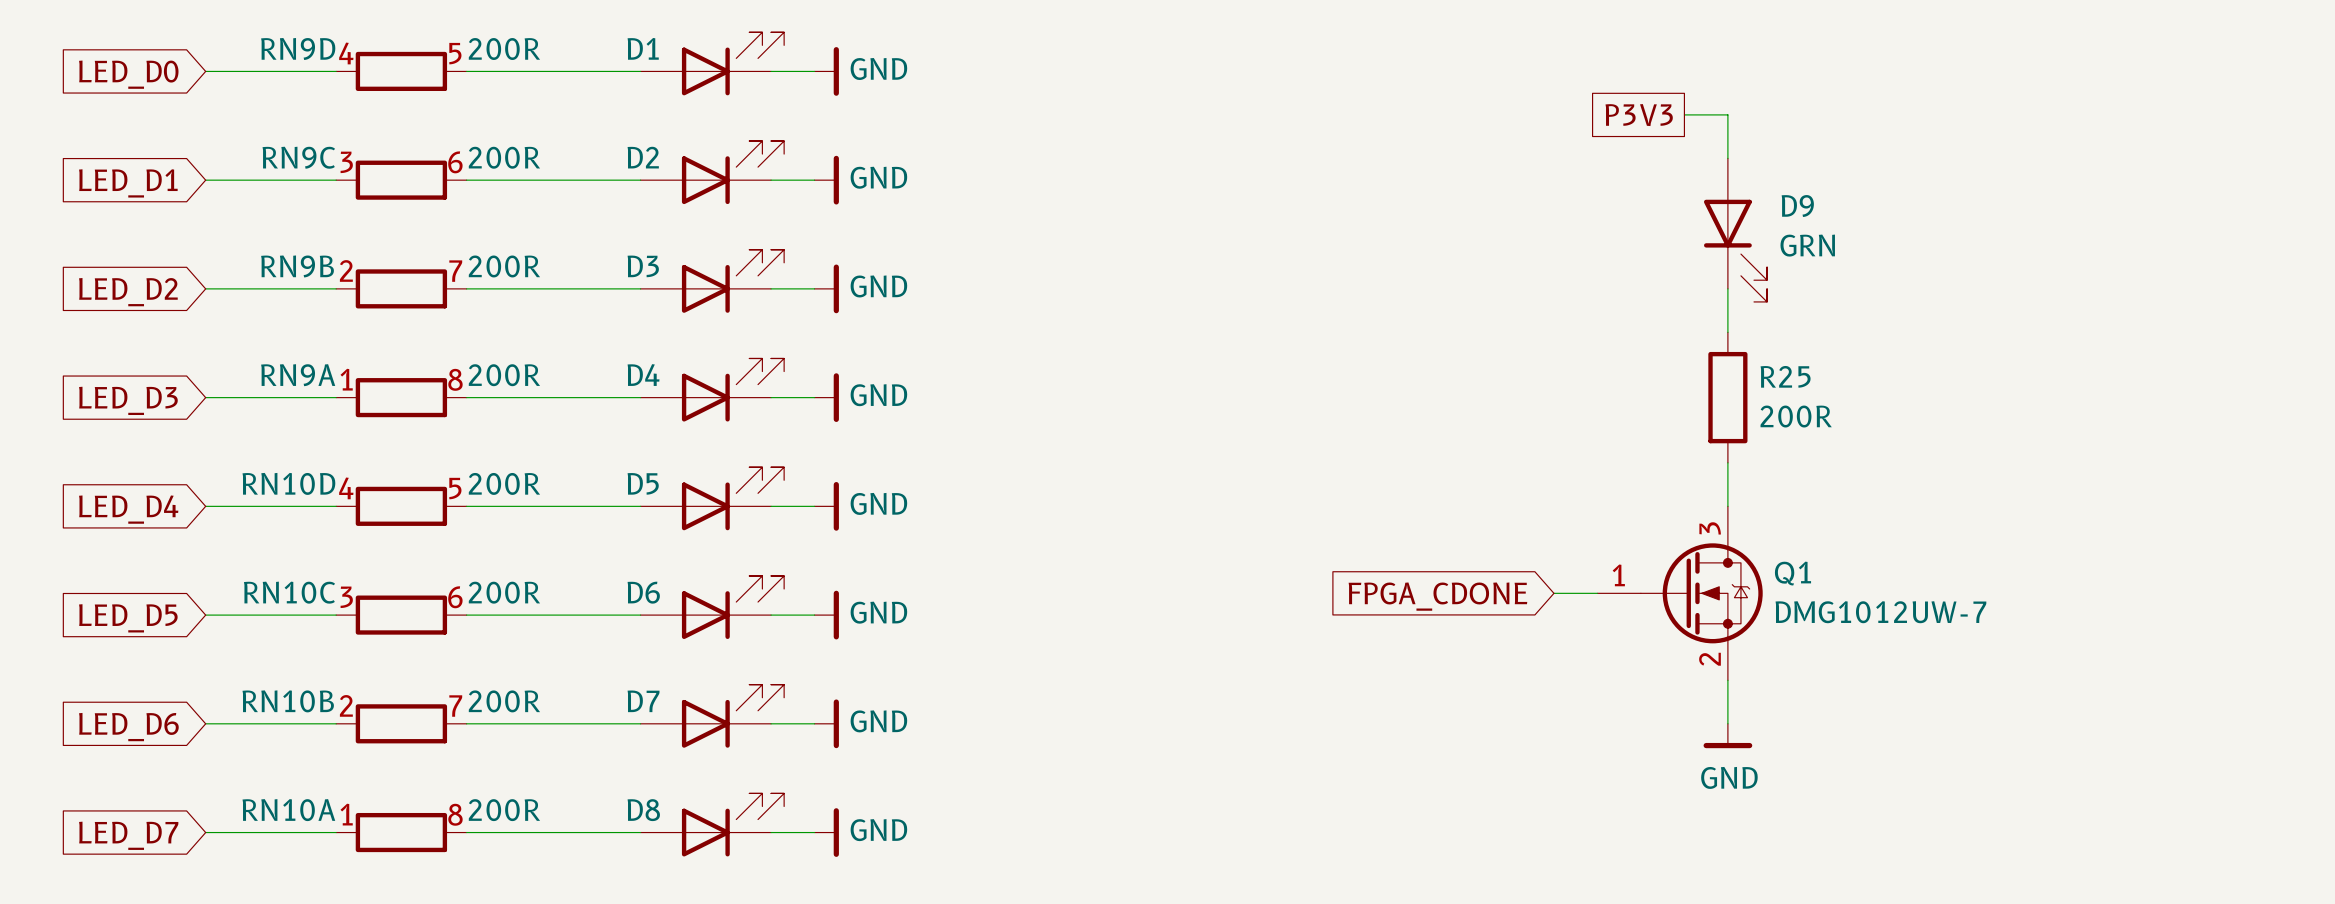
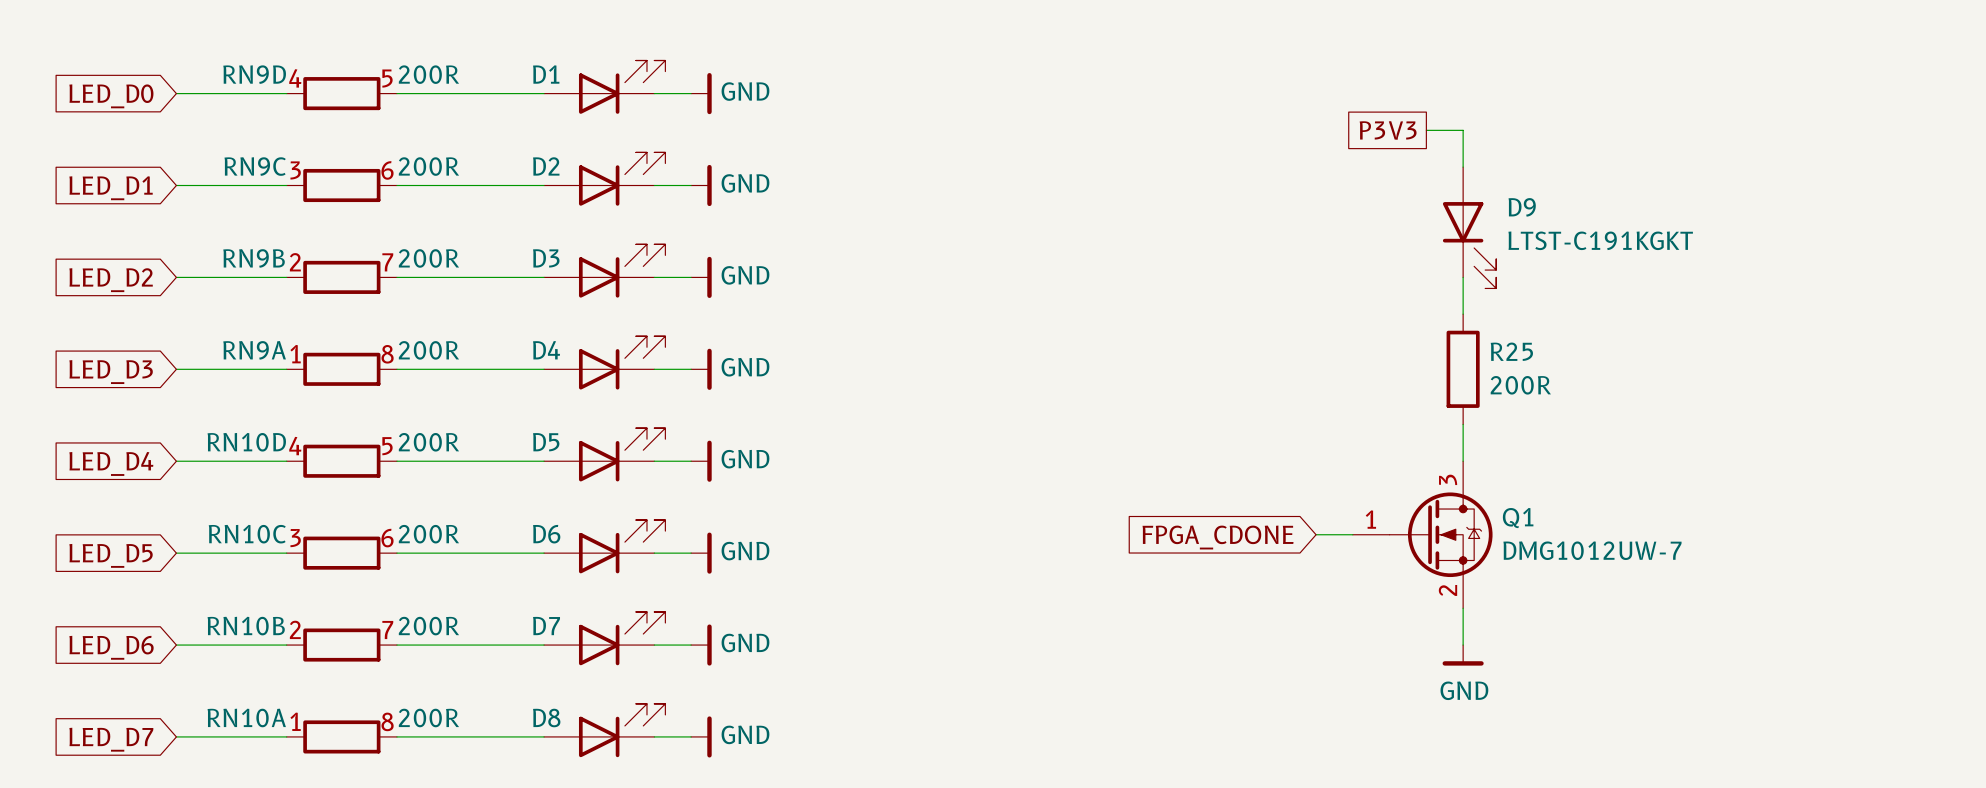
D9 value: GRN (1807, 245) -> LTST-C191KGKT (1600, 240)

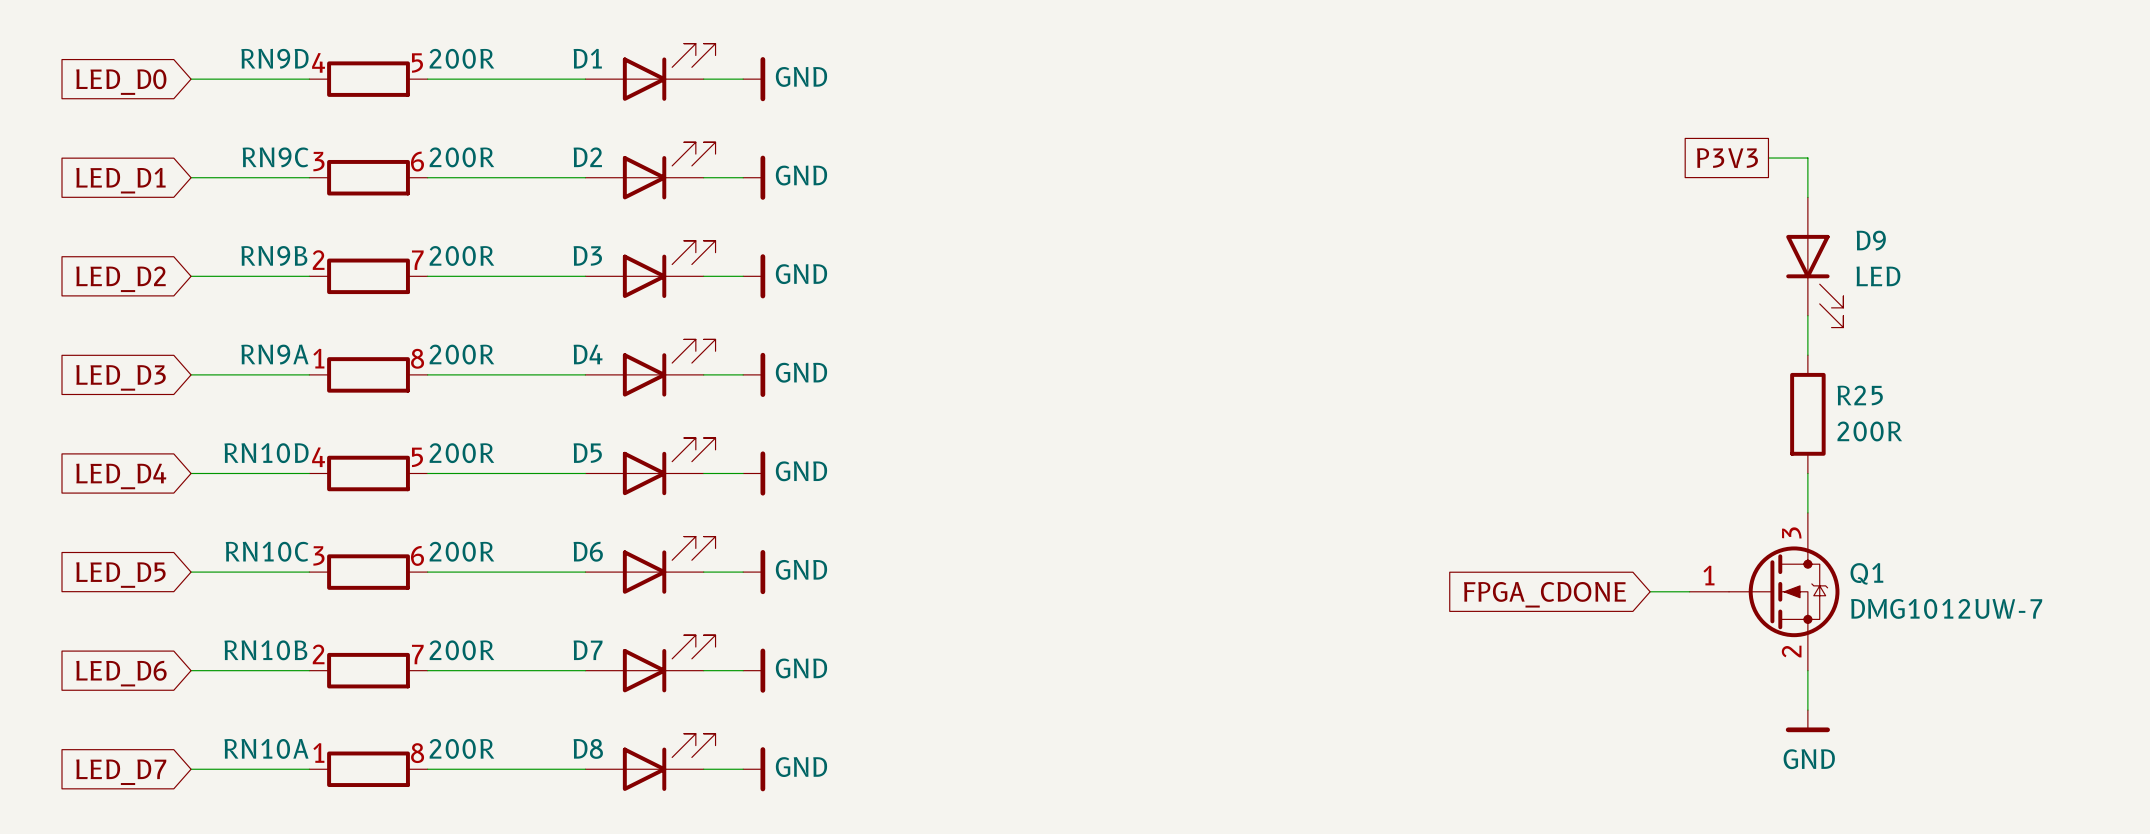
global label position: P3V3 (1388, 130) -> P3V3 (1727, 158)
wire: (1426, 130) (1463, 130) (1463, 167) -> (1768, 158) (1807, 158) (1807, 197)
D9 position: (1469, 227) -> (1814, 262)
D9 value: LTST-C191KGKT (1600, 240) -> LED (1878, 276)
wire: (1463, 277) (1463, 314) -> (1807, 315) (1807, 355)
R25 position: (1463, 369) -> (1807, 414)
wire: (1463, 424) (1463, 461) -> (1807, 473) (1807, 512)
wire: (1316, 534) (1352, 534) -> (1650, 591) (1689, 591)
Q1 position: (1422, 534) -> (1764, 591)
global label position: FPGA_CDONE (1218, 537) -> FPGA_CDONE (1544, 594)
wire: (1463, 608) (1463, 645) -> (1807, 670) (1807, 710)
power symbol position: GND (1463, 655) -> GND (1807, 721)

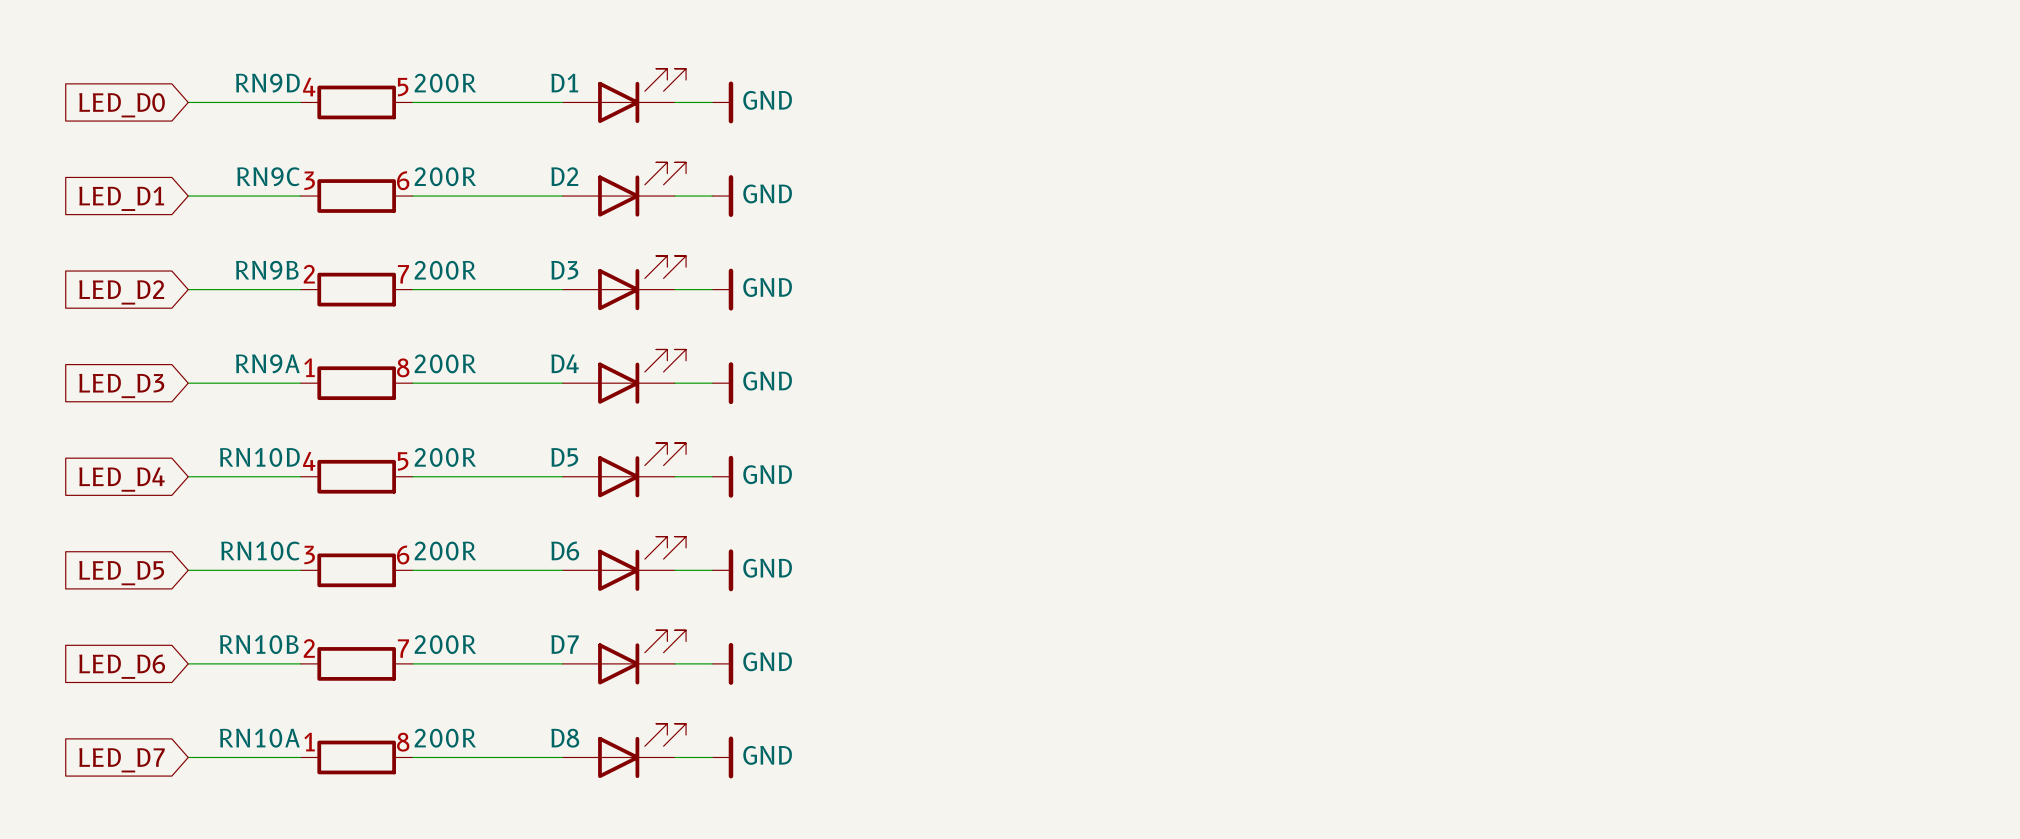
global label: P3V3 (1727, 158) -> none
wire: (1768, 158) (1807, 158) (1807, 197) -> none
D9: LED (1814, 262) -> none
wire: (1807, 315) (1807, 355) -> none
R25: 200R (1807, 414) -> none
wire: (1807, 473) (1807, 512) -> none
wire: (1650, 591) (1689, 591) -> none
Q1: DMG1012UW-7 (1764, 591) -> none
global label: FPGA_CDONE (1544, 594) -> none
wire: (1807, 670) (1807, 710) -> none
power symbol: GND (1807, 721) -> none

